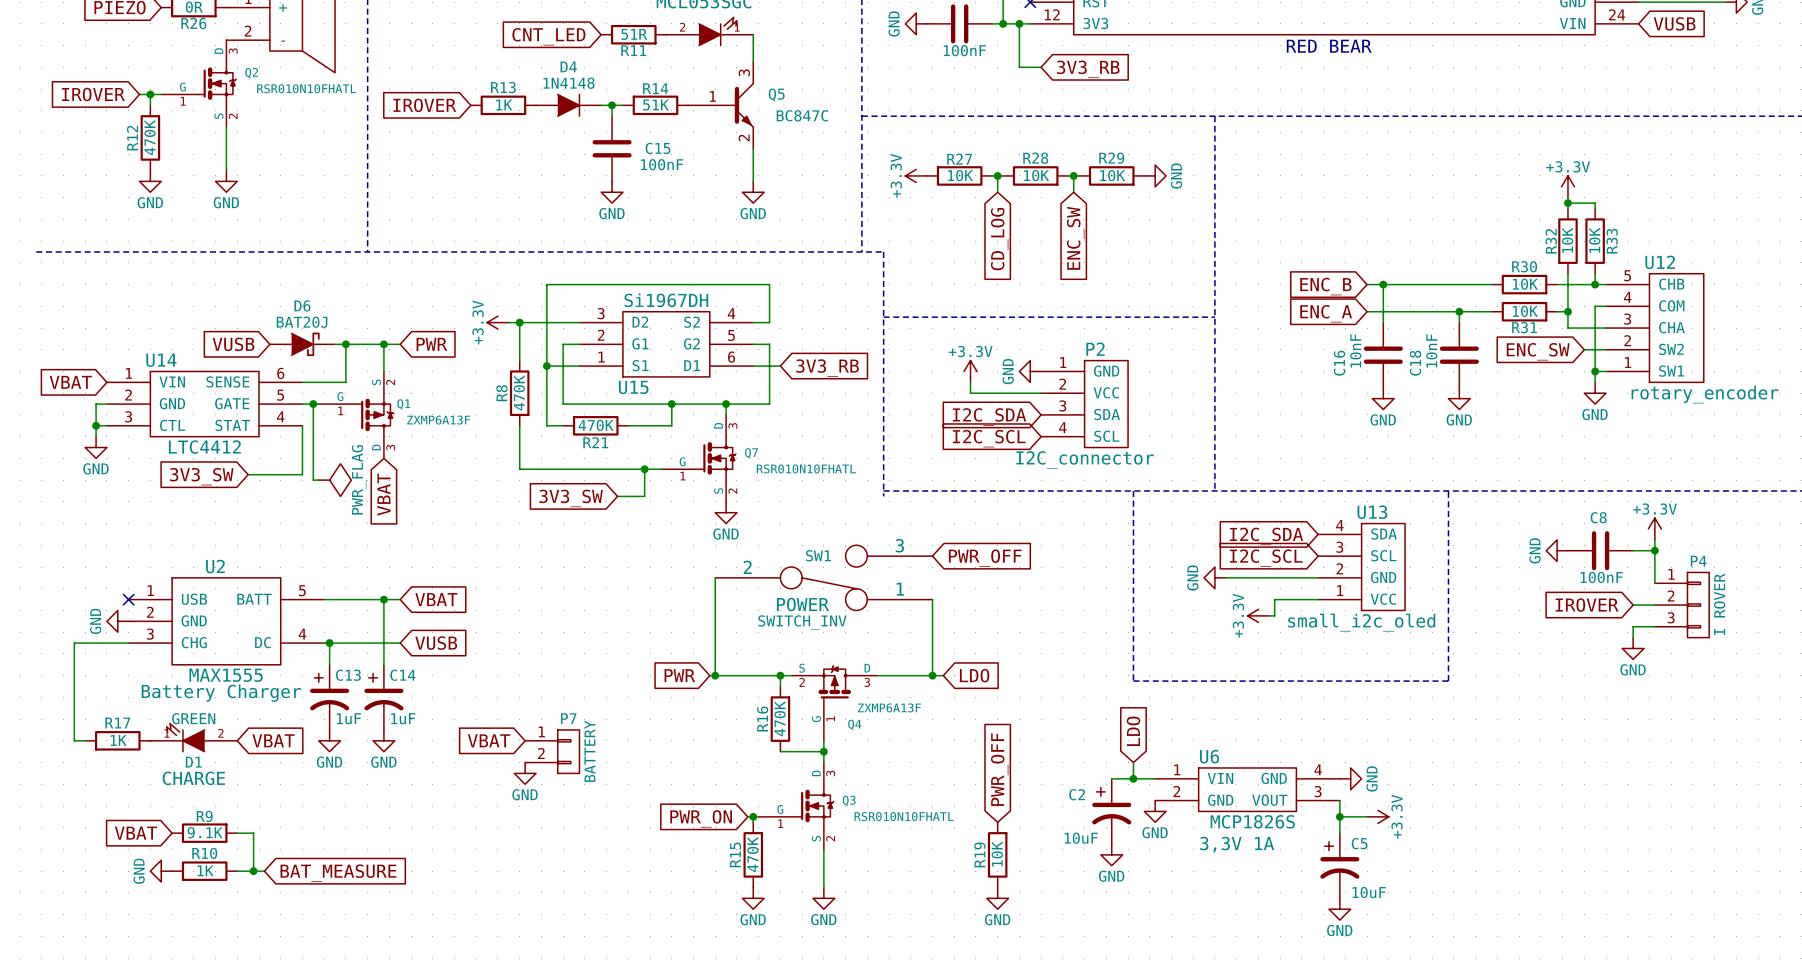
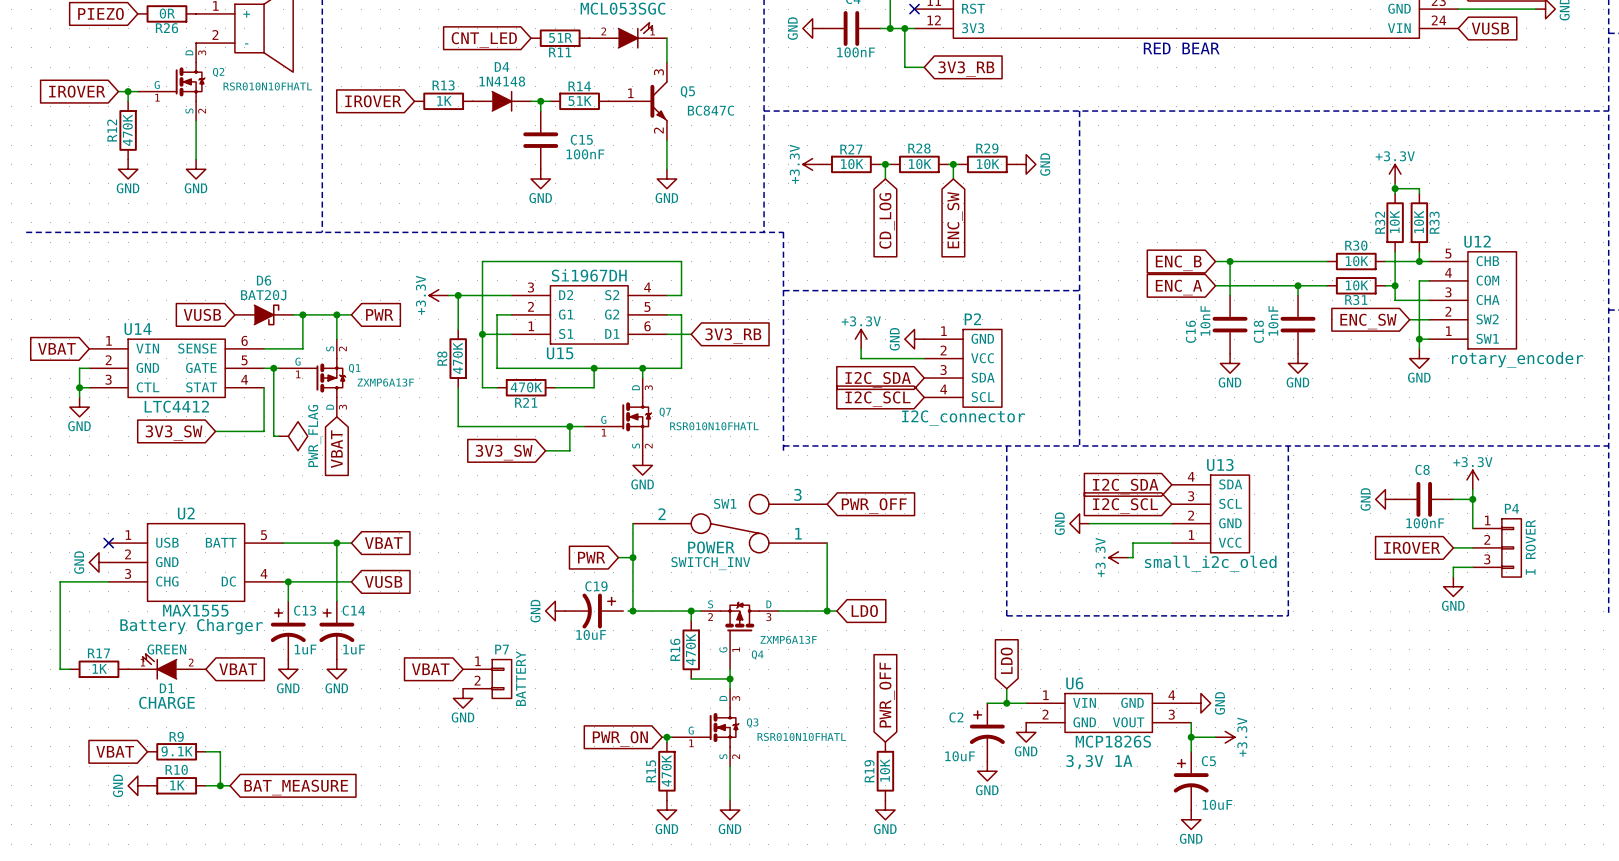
wire: none -> (618, 557) (632, 557)
junction: none -> (632, 557)
power symbol: none -> GND (555, 611)
C19: none -> 10uF (594, 611)
global label position: PWR (679, 675) -> PWR (591, 557)

